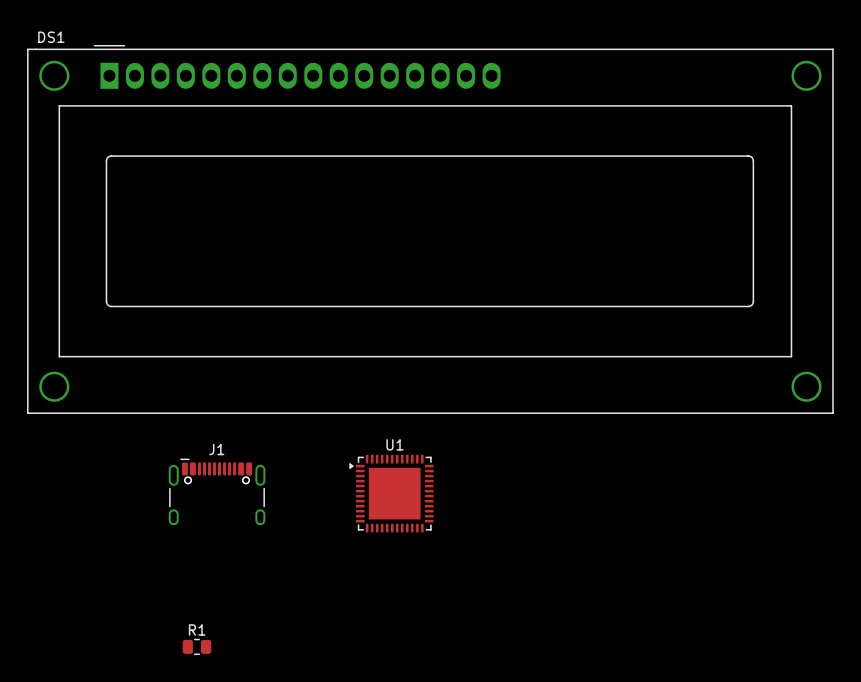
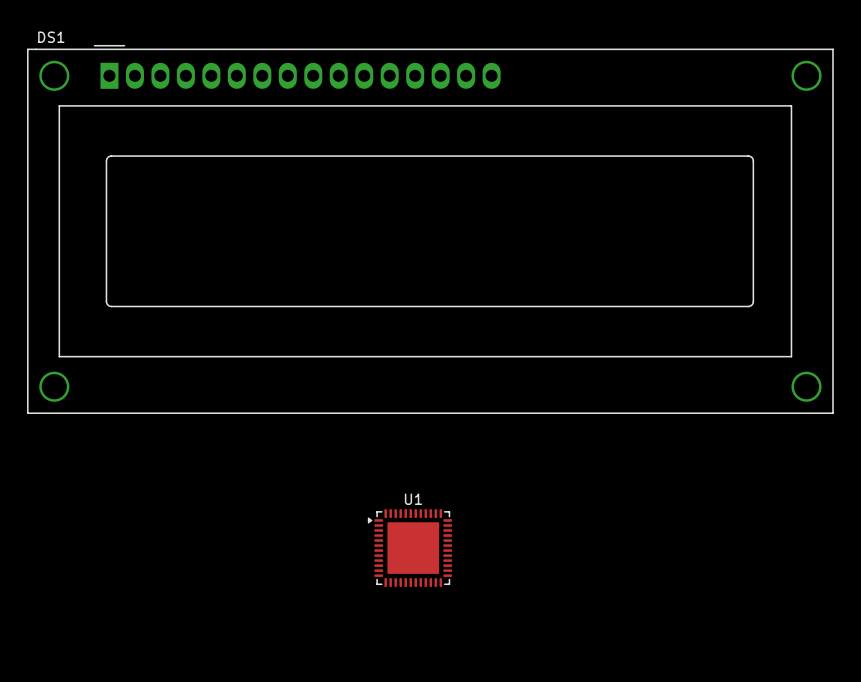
J1: (217, 492) -> none
U1 position: (391, 493) -> (409, 548)
R1: (196, 646) -> none

